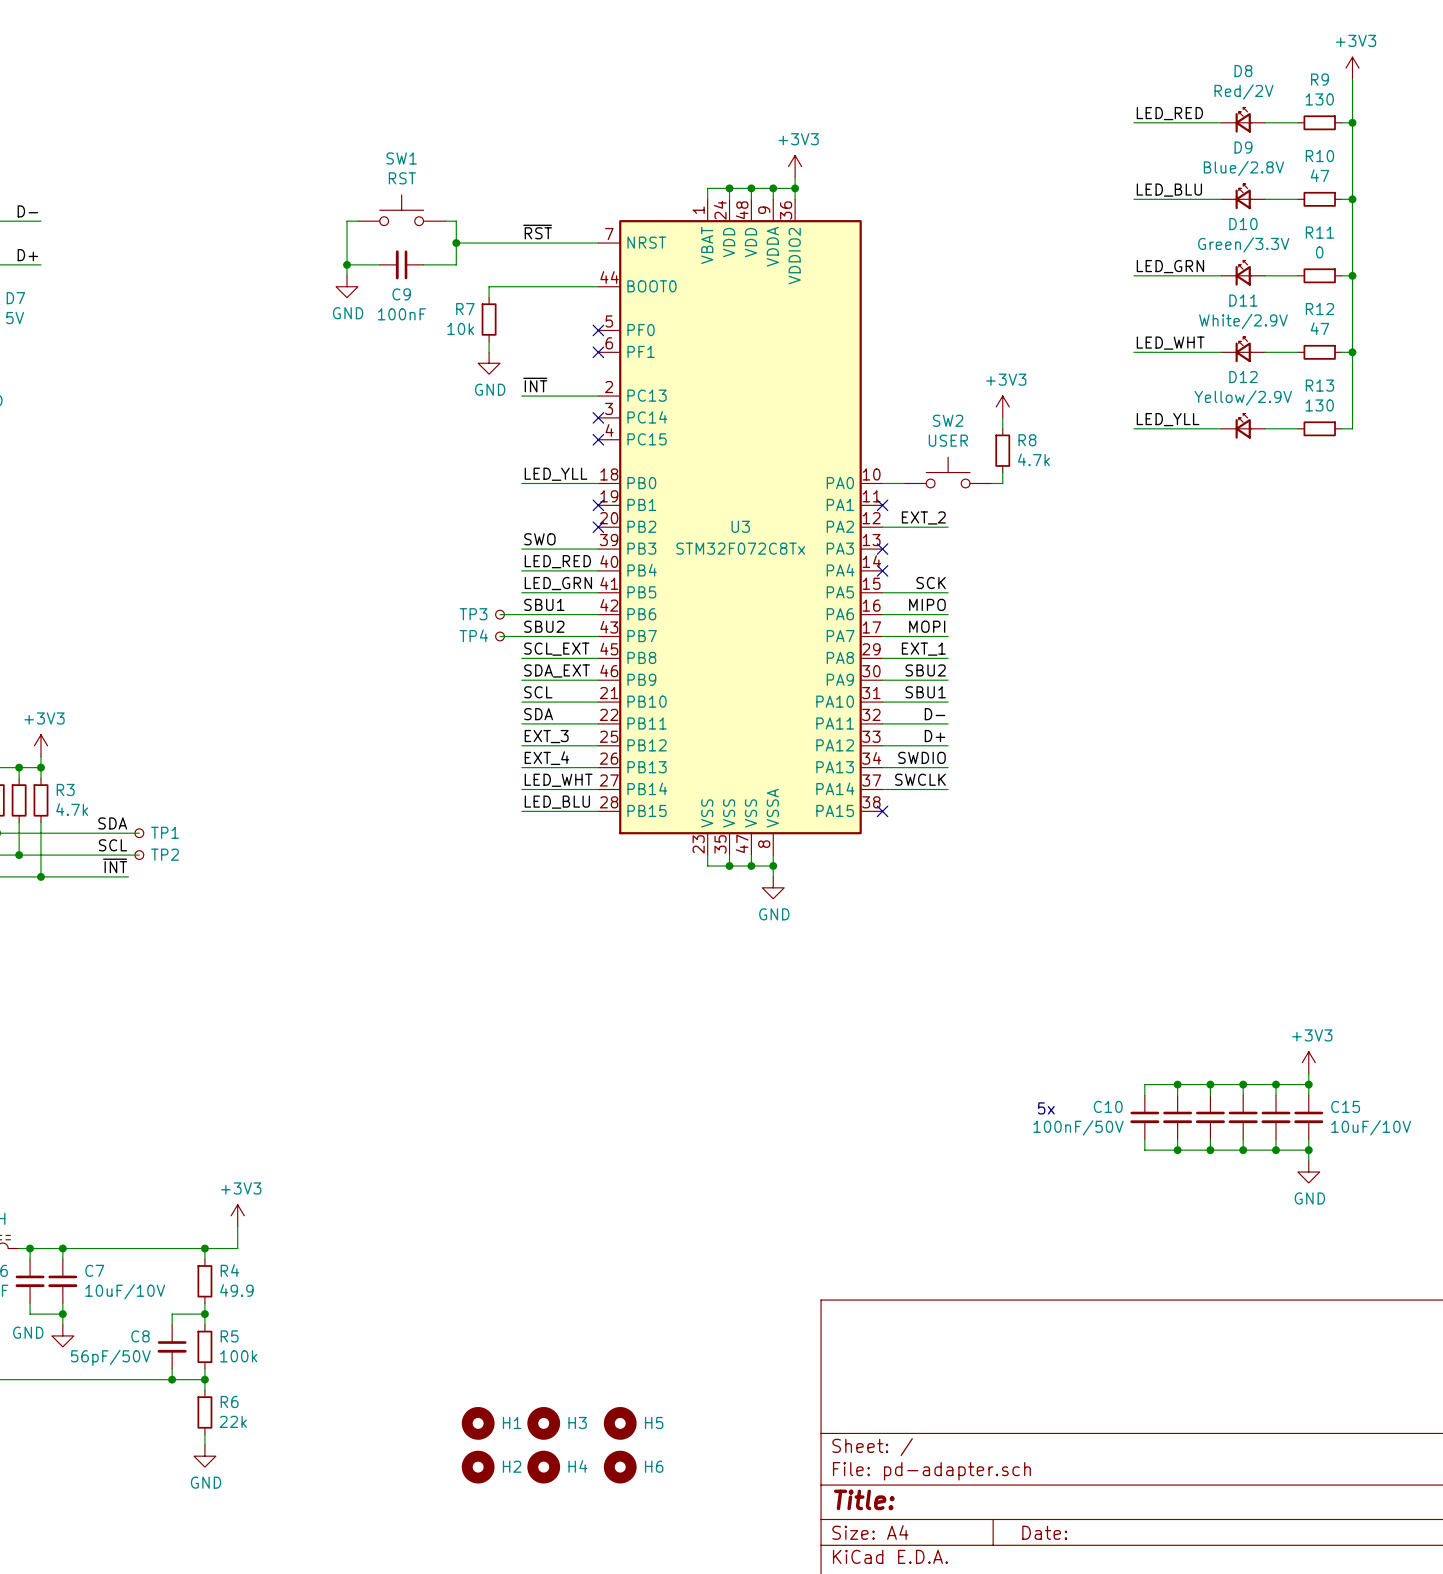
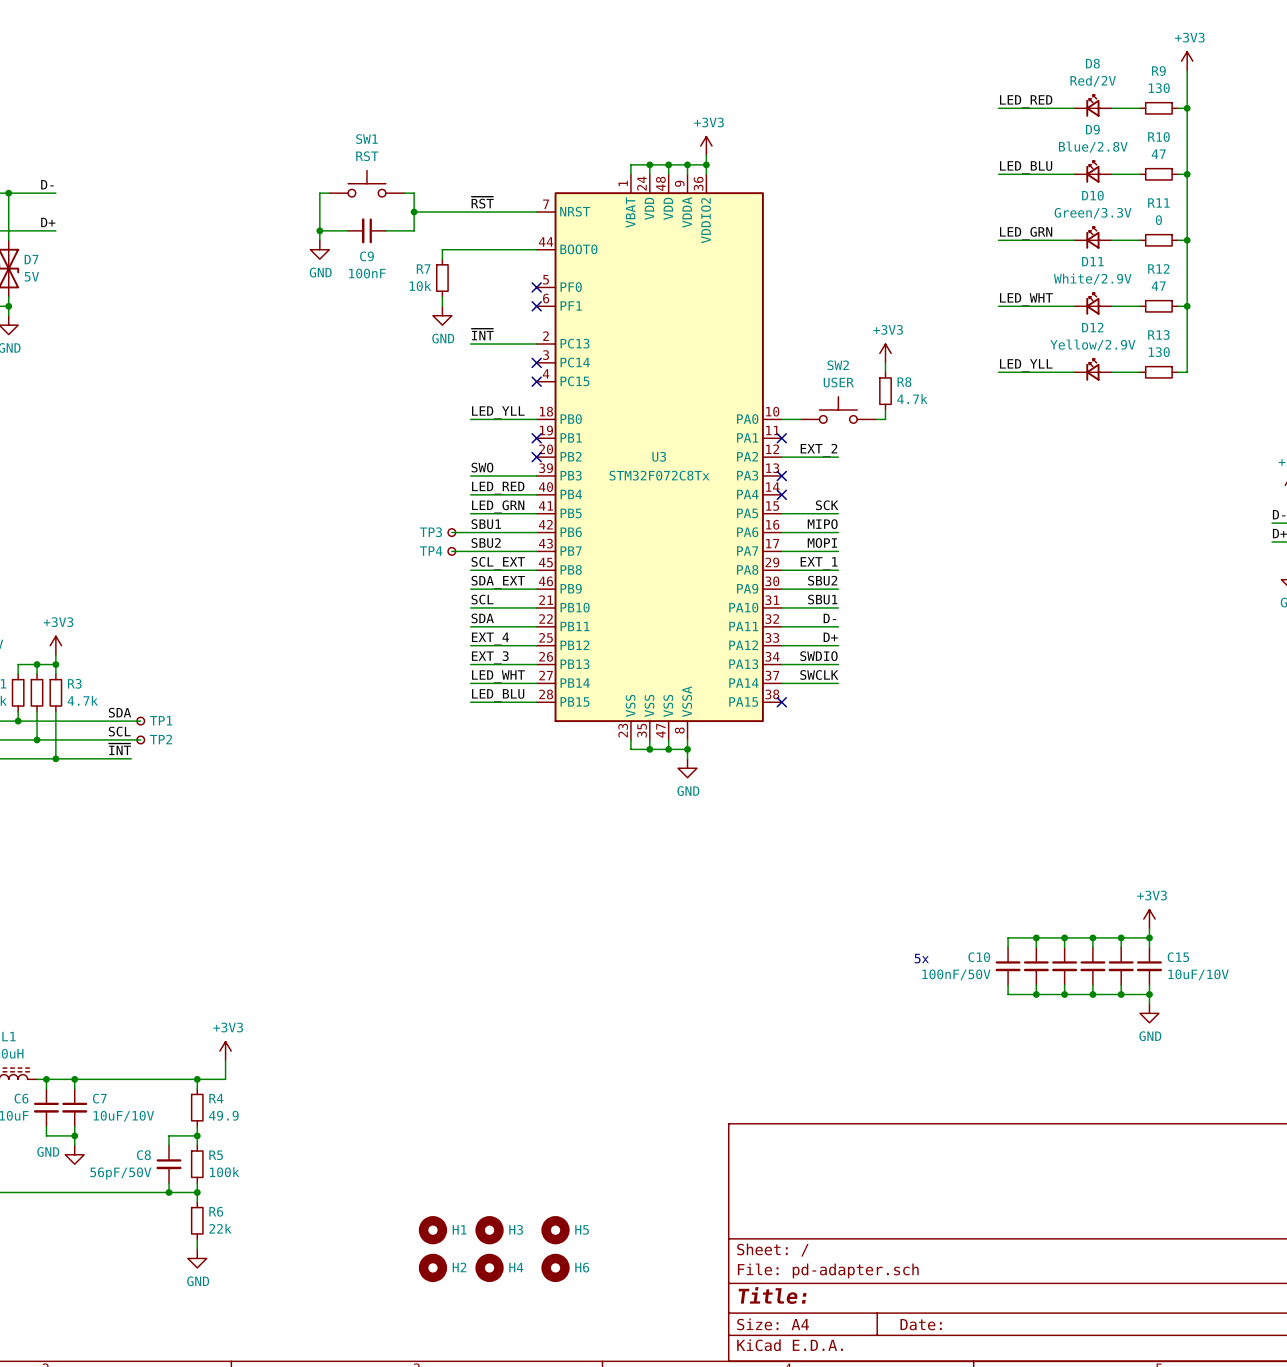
label: EXT_3 (546, 736) -> EXT_4 (490, 638)
label: EXT_4 (546, 758) -> EXT_3 (490, 657)

